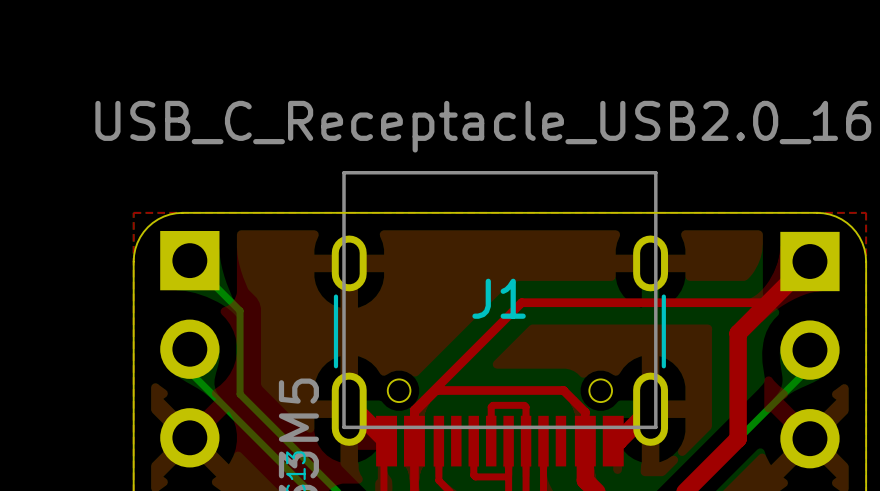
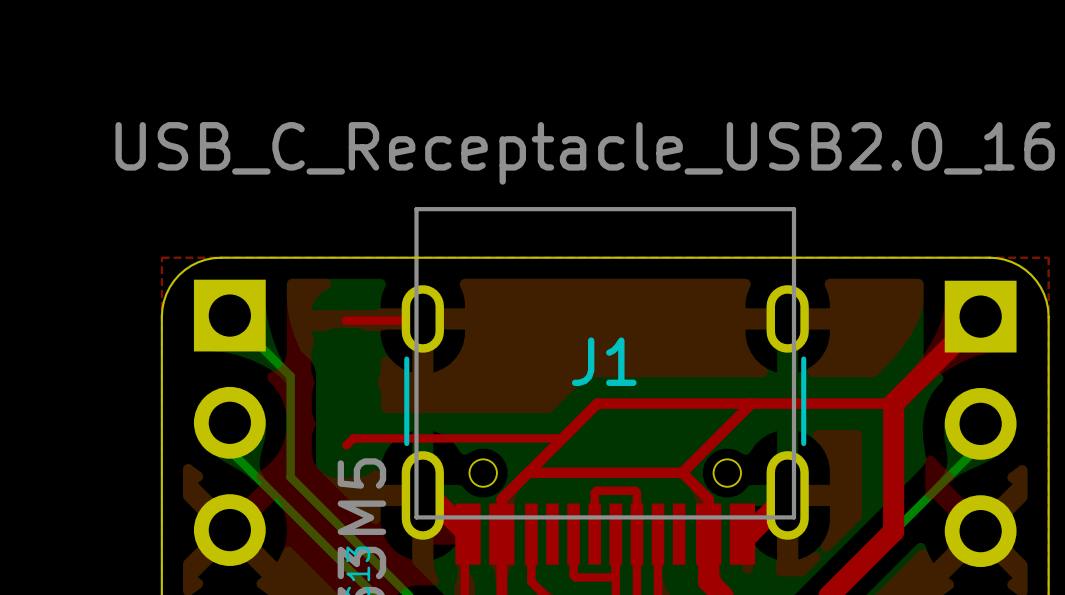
top track: (809, 261) (768, 302) (521, 302) (414, 409) (414, 412) -> none
top track: none -> (422, 318) (421, 320) (345, 320)
top track: none -> (751, 403) (682, 472)
top track: none -> (893, 403) (597, 403) (528, 472)
top track: none -> (567, 433) (562, 438) (353, 438) (346, 445)

